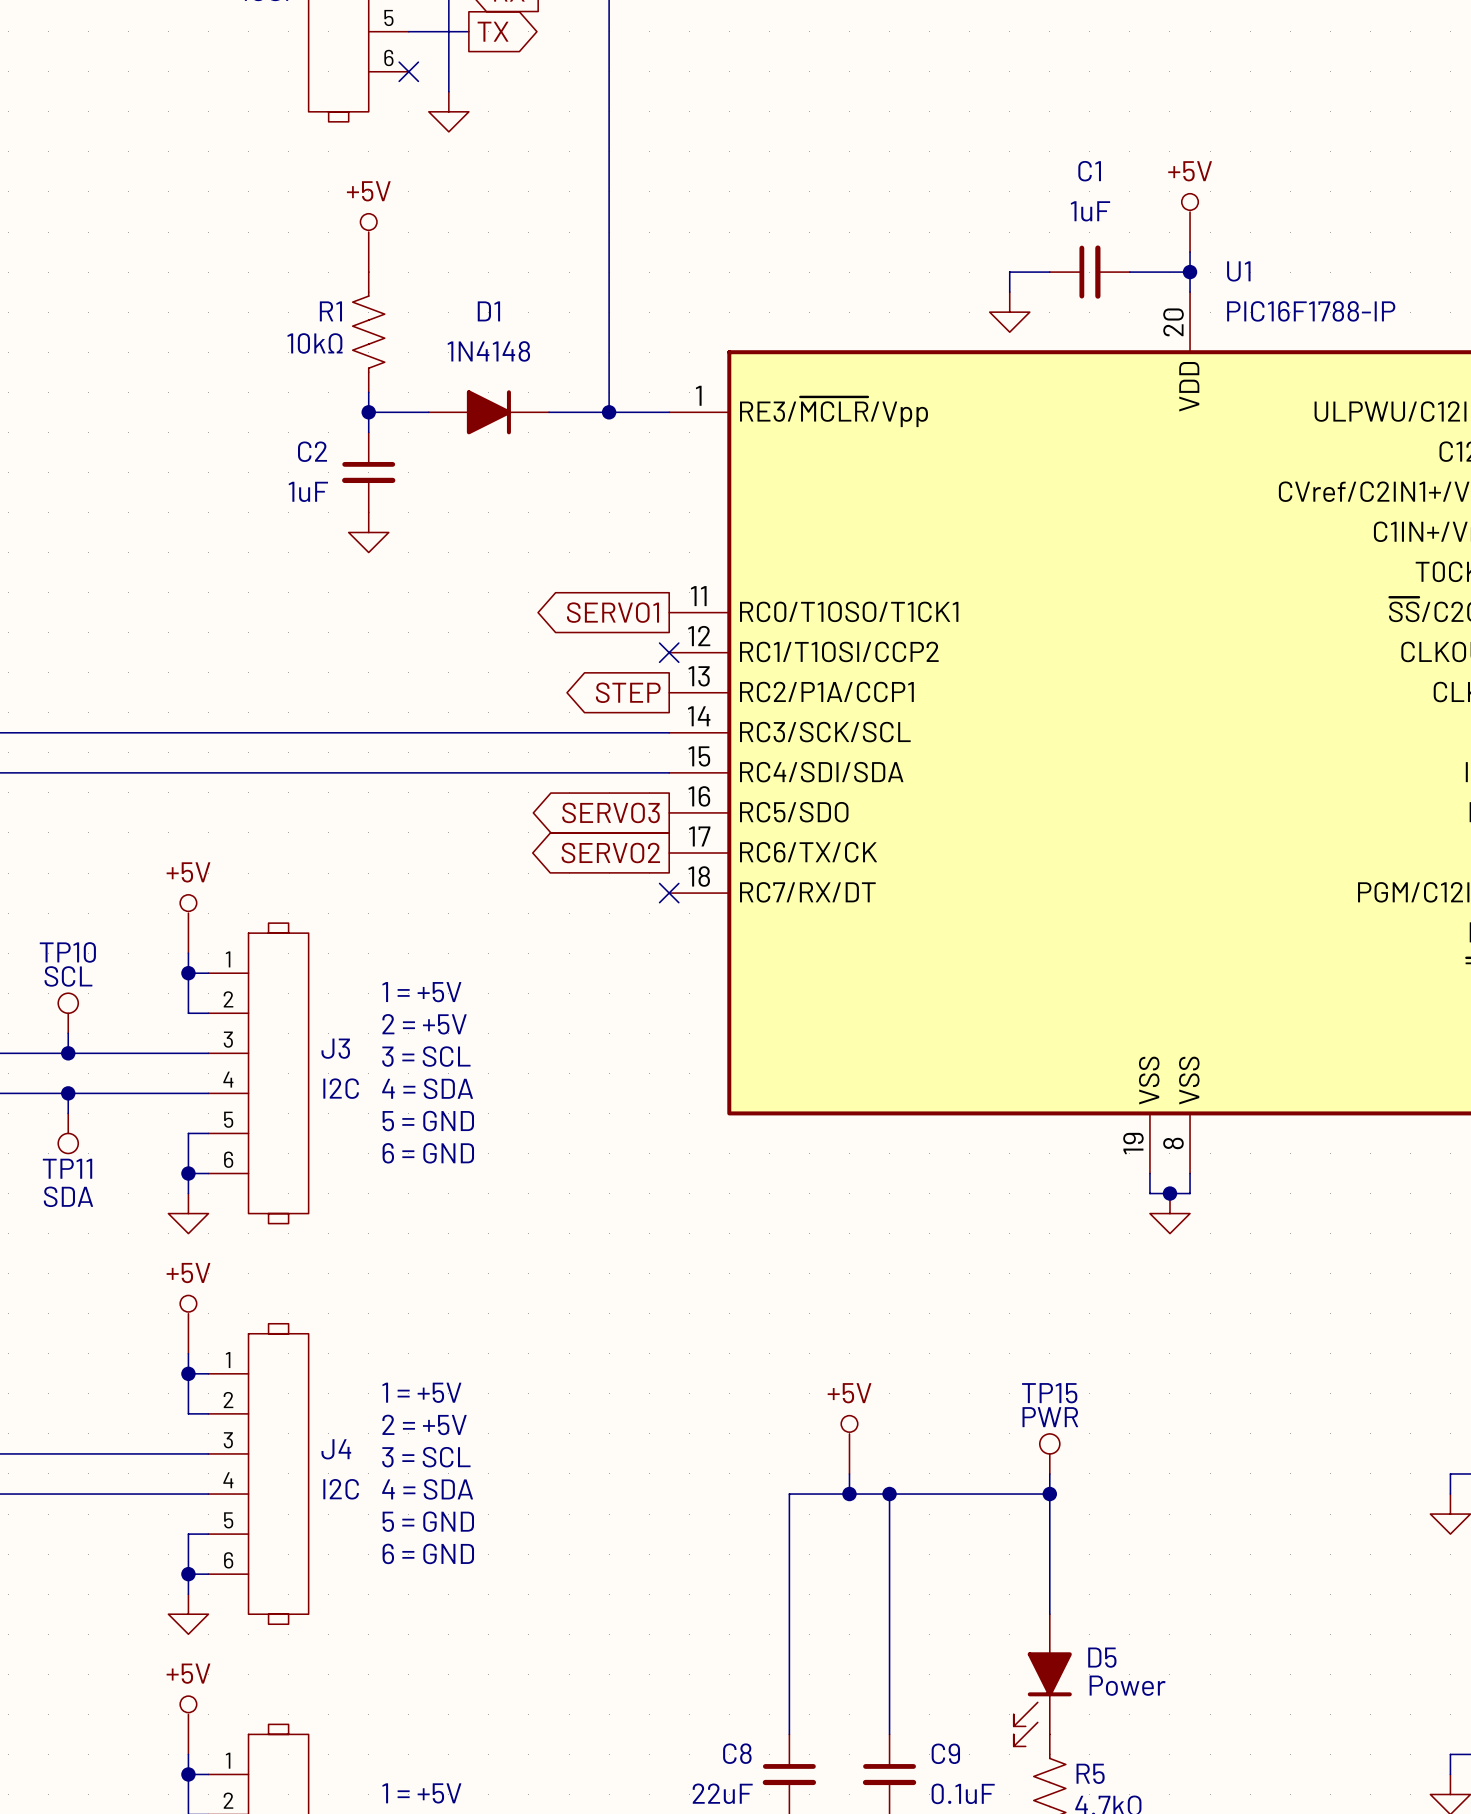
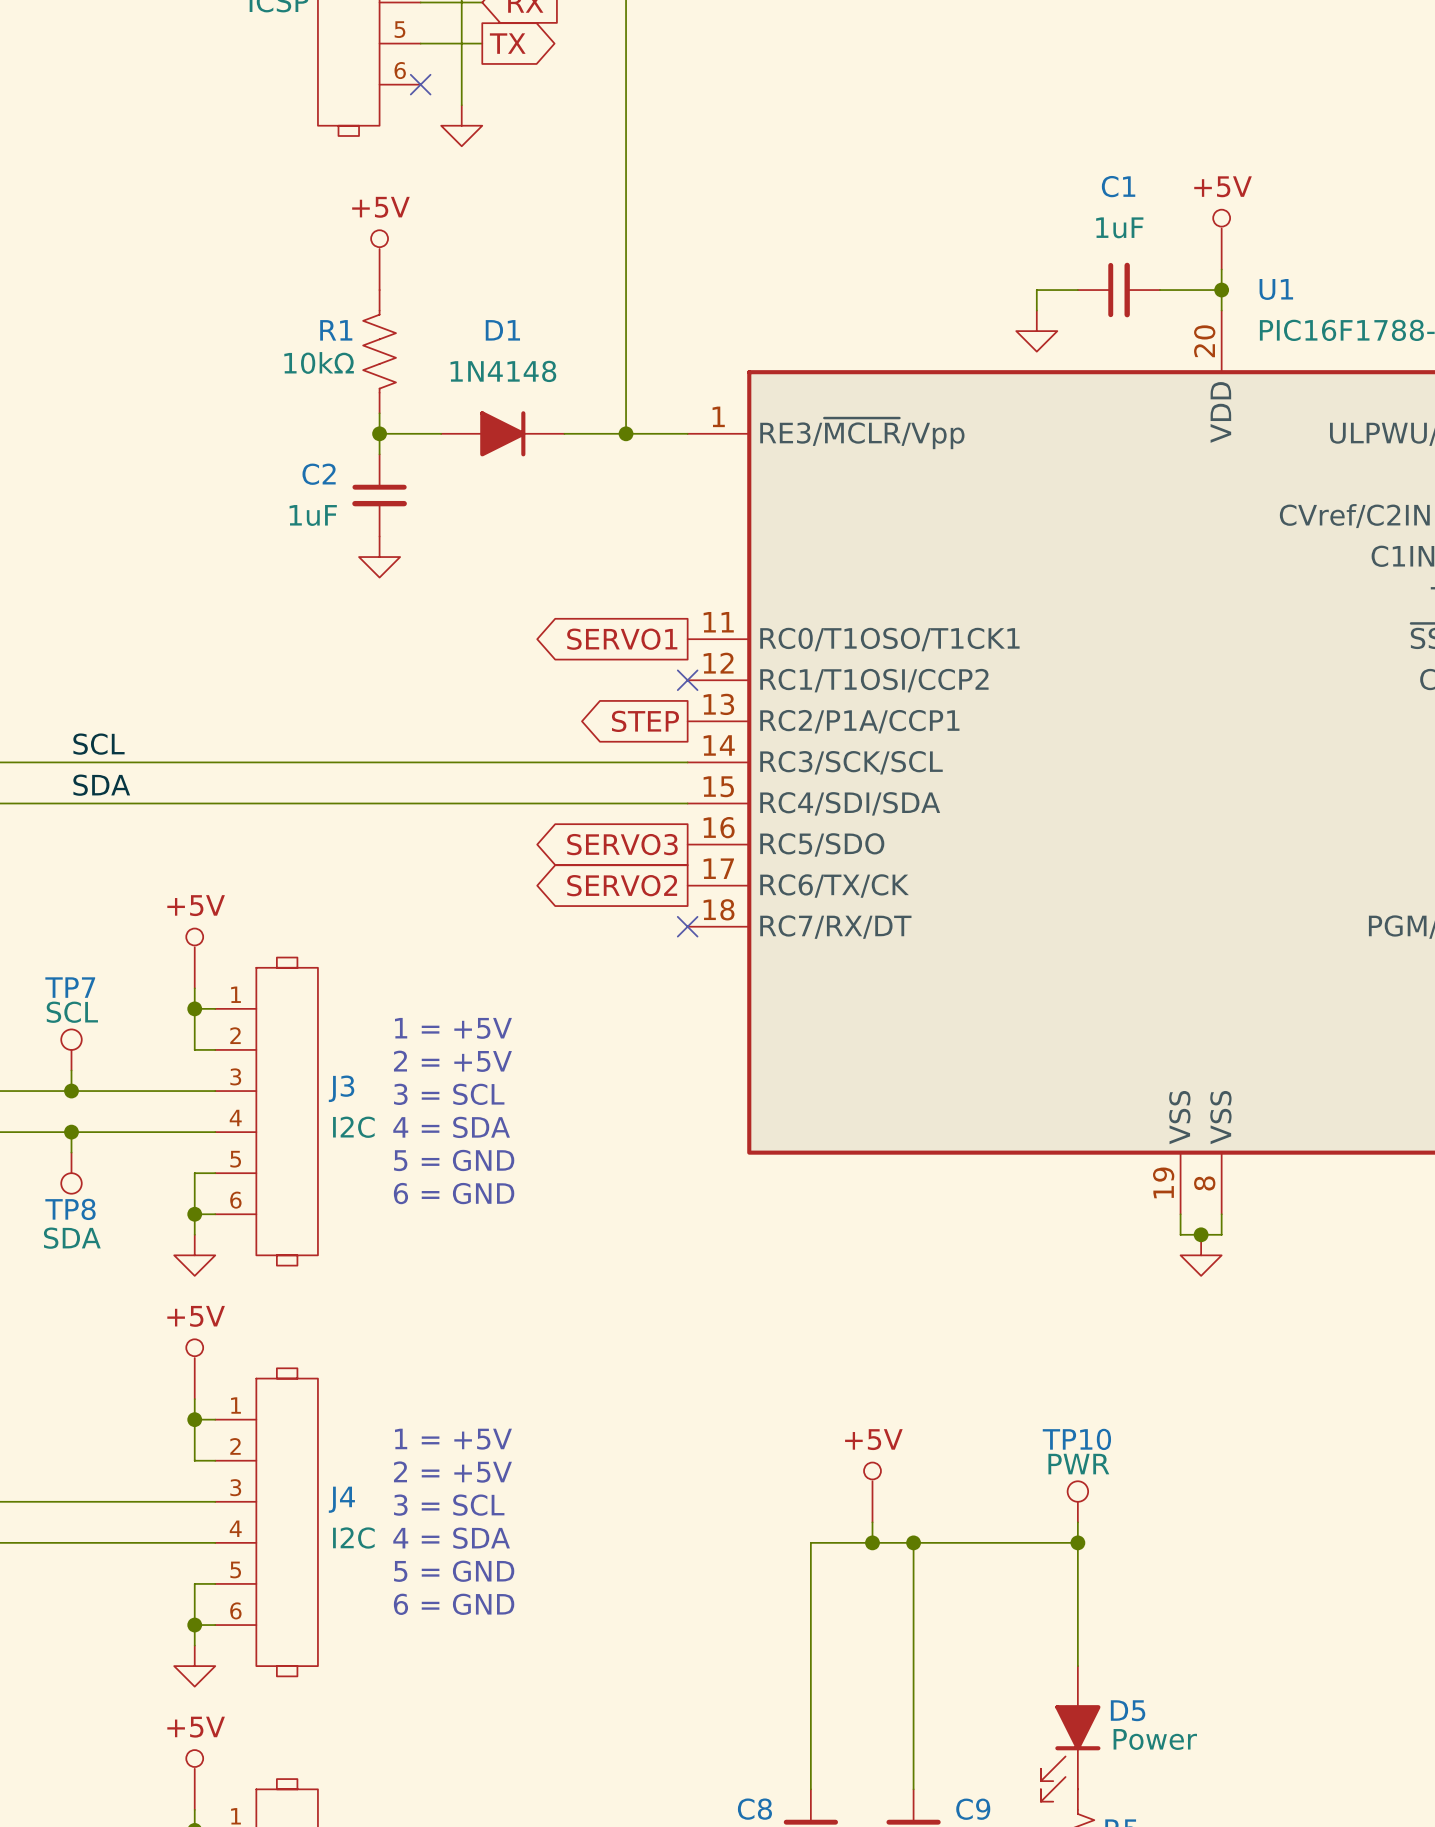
label: none -> SCL (98, 744)
label: none -> SDA (101, 785)
TP10 name: TP10 (67, 952) -> TP7 (70, 987)
TP11 name: TP11 (67, 1168) -> TP8 (70, 1209)
TP15 name: TP15 (1049, 1393) -> TP10 (1076, 1439)

